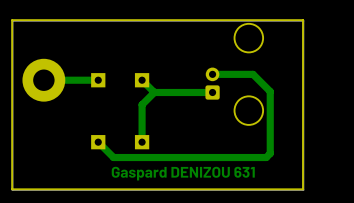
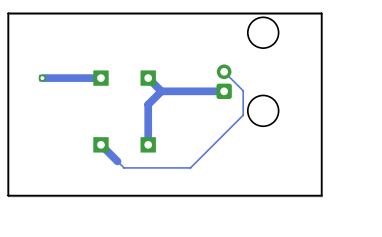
part footprint: [22, 58, 66, 102] -> [39, 74, 46, 82]
bottom track: (212, 74) (253, 74) (270, 91) (270, 153) (266, 157) (113, 157) -> (224, 71) (243, 90) (243, 115) (190, 167) (124, 167) (117, 161)
text: Gaspard DENIZOU 631 (183, 173) -> none

